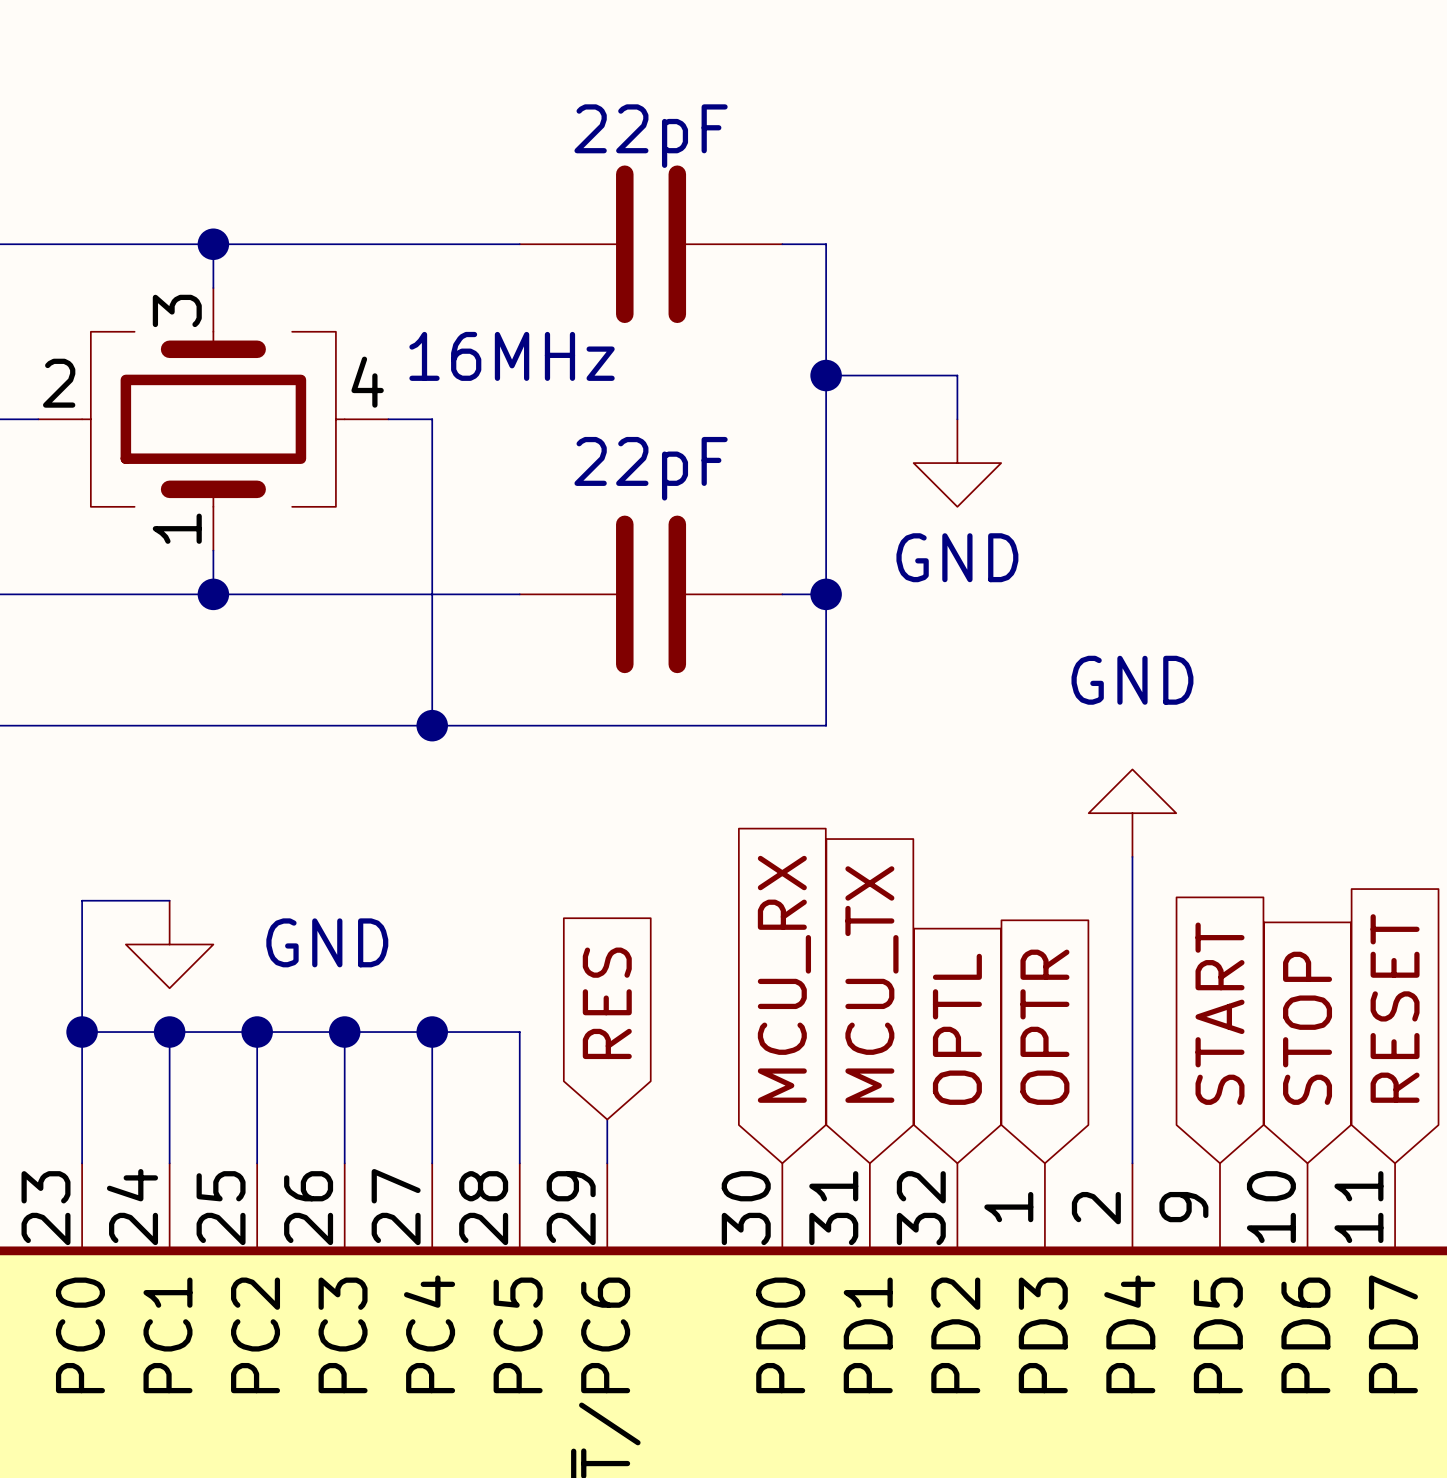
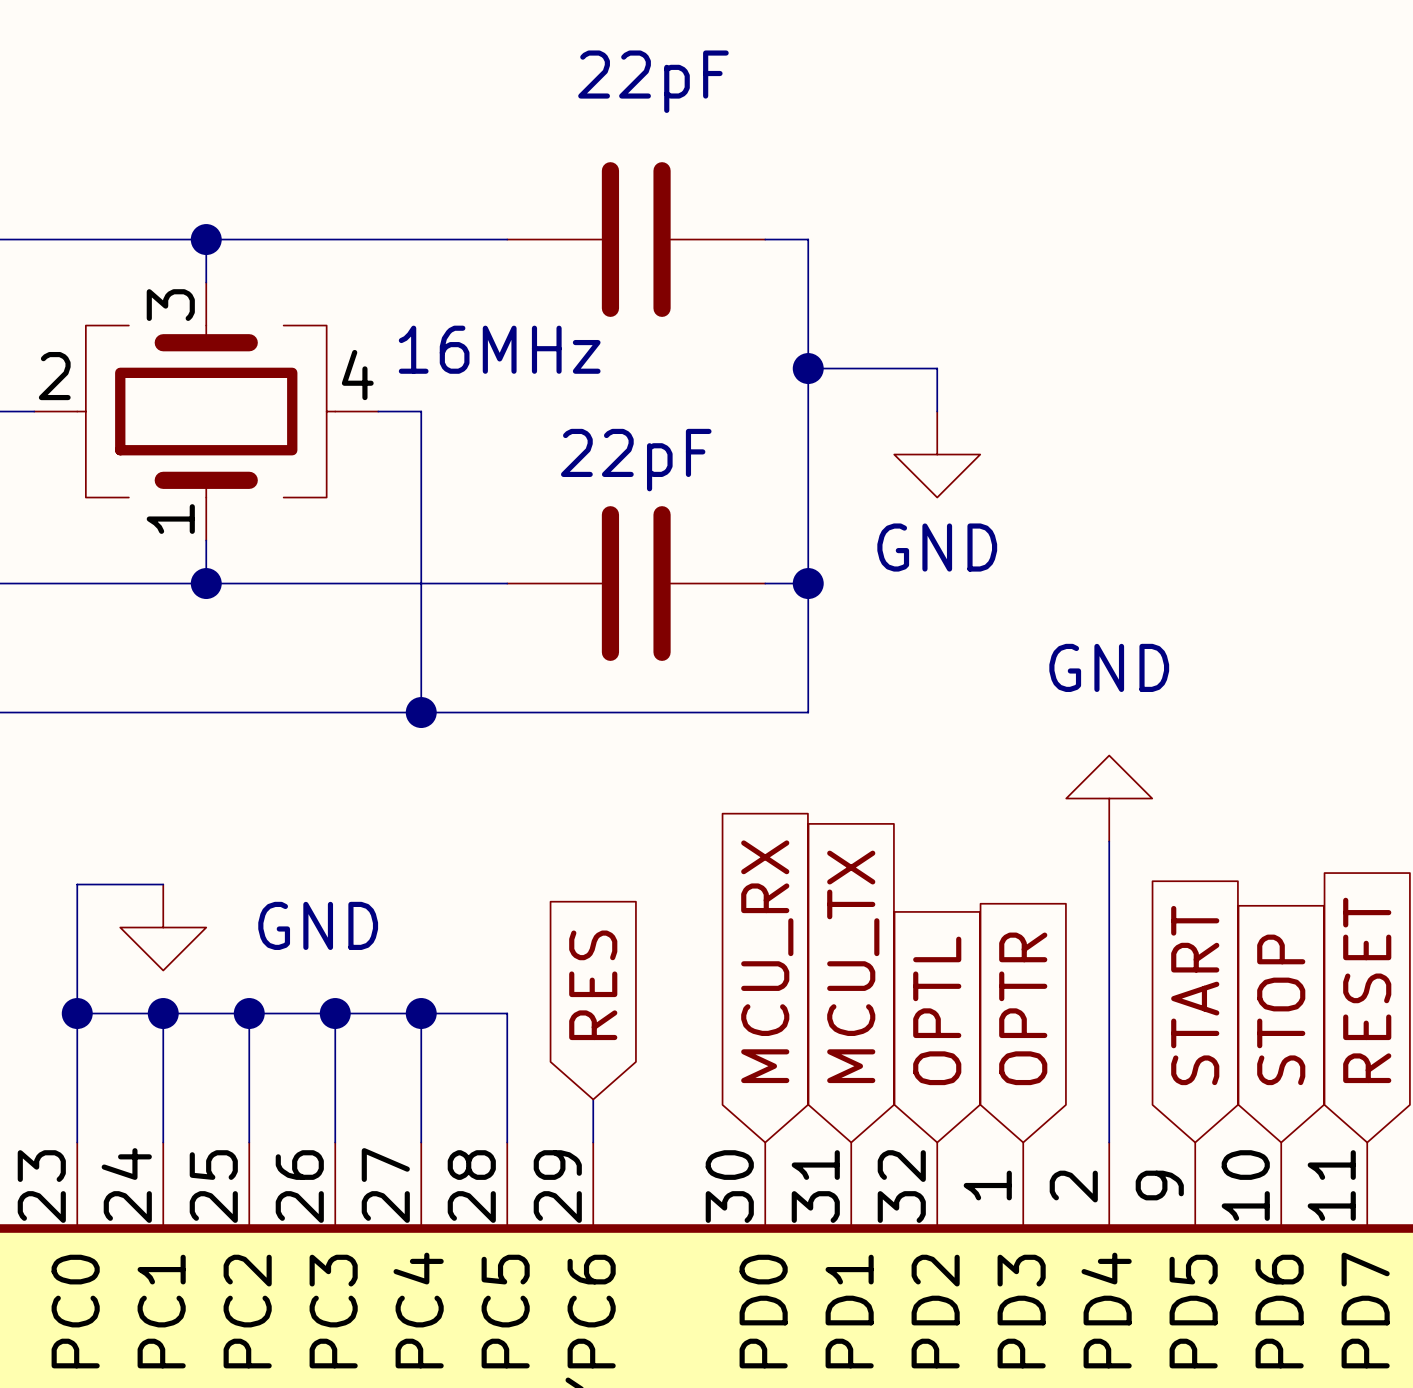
part value position: 22pF (651, 136) -> 22pF (653, 81)

